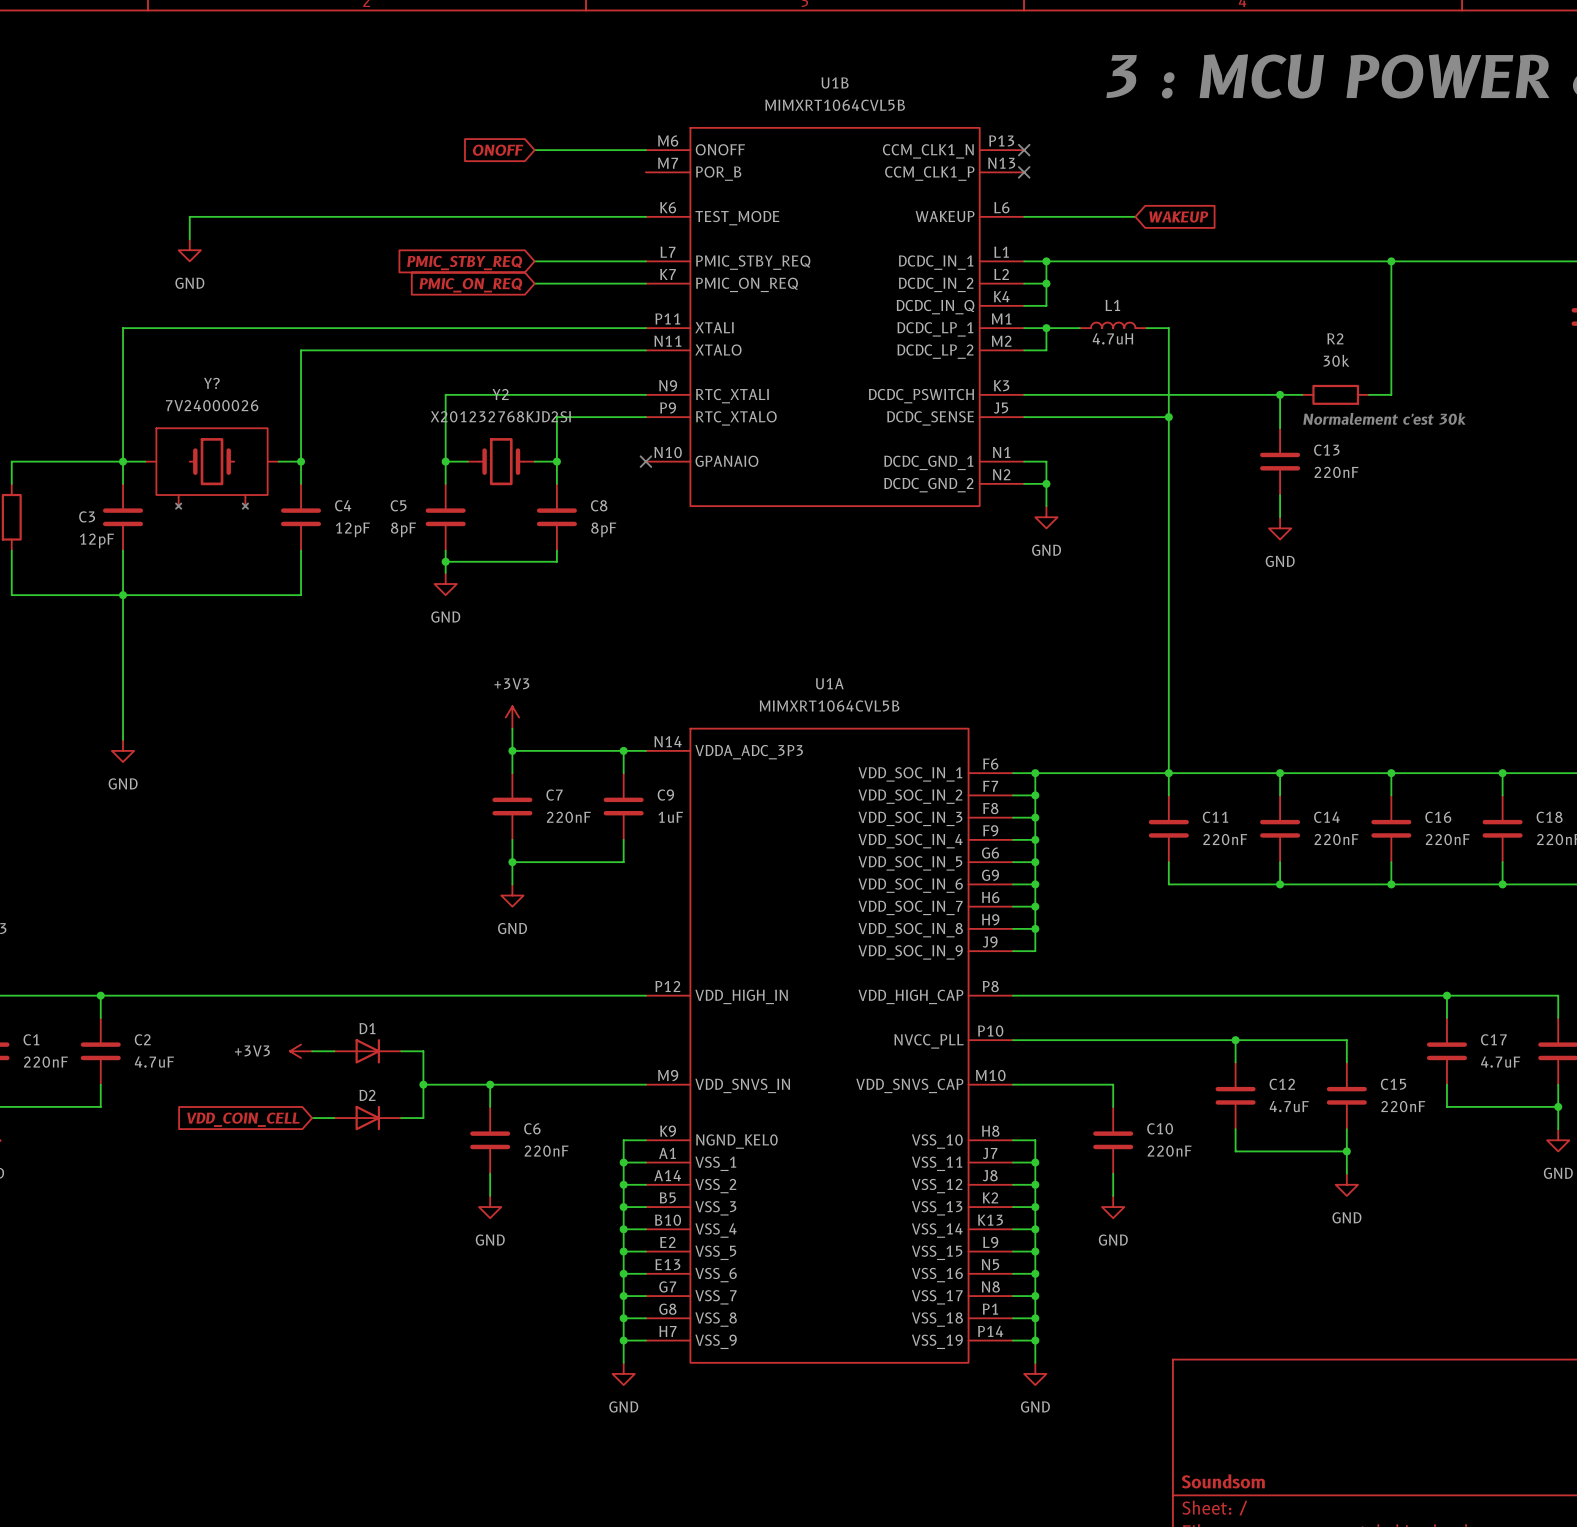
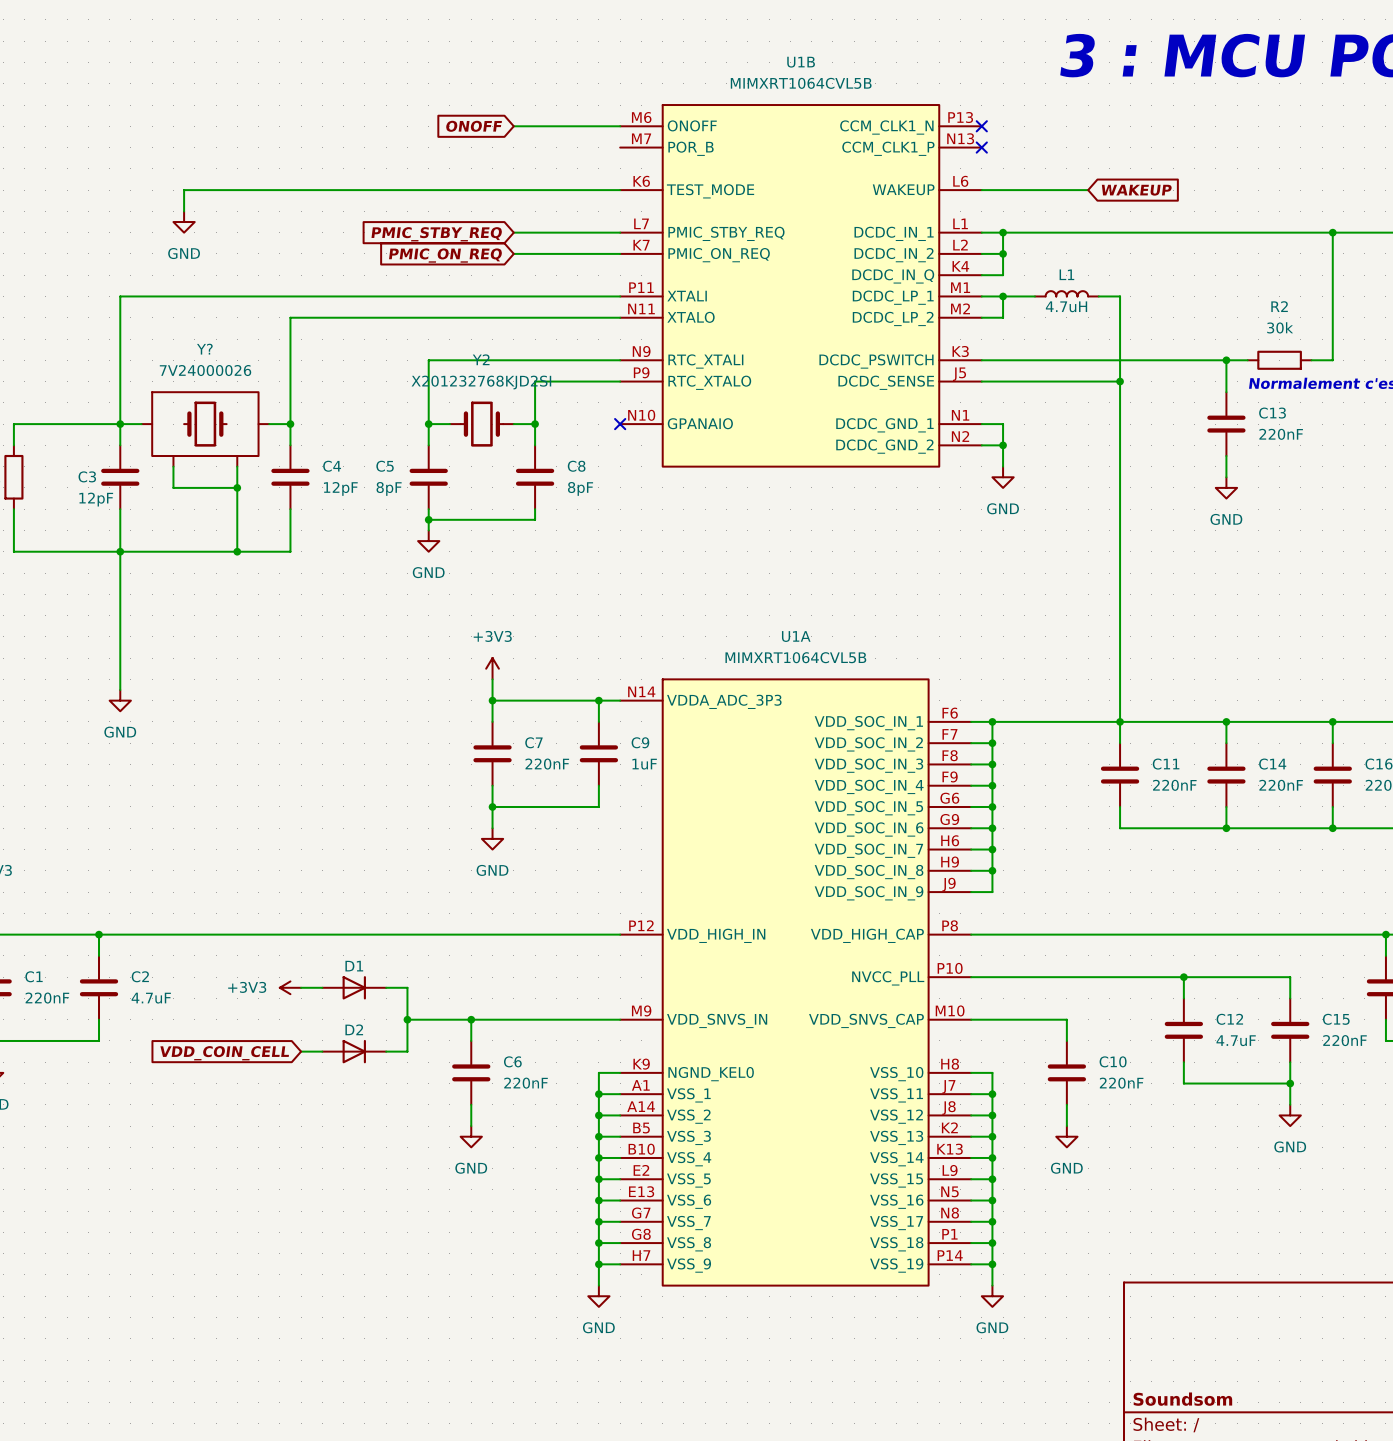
Y? symbol: [145, 428, 279, 509] -> [141, 392, 270, 467]
wire: none -> (173, 466) (173, 487) (237, 487)
wire: none -> (237, 466) (237, 551)
junction: none -> (237, 487)
junction: none -> (237, 551)

